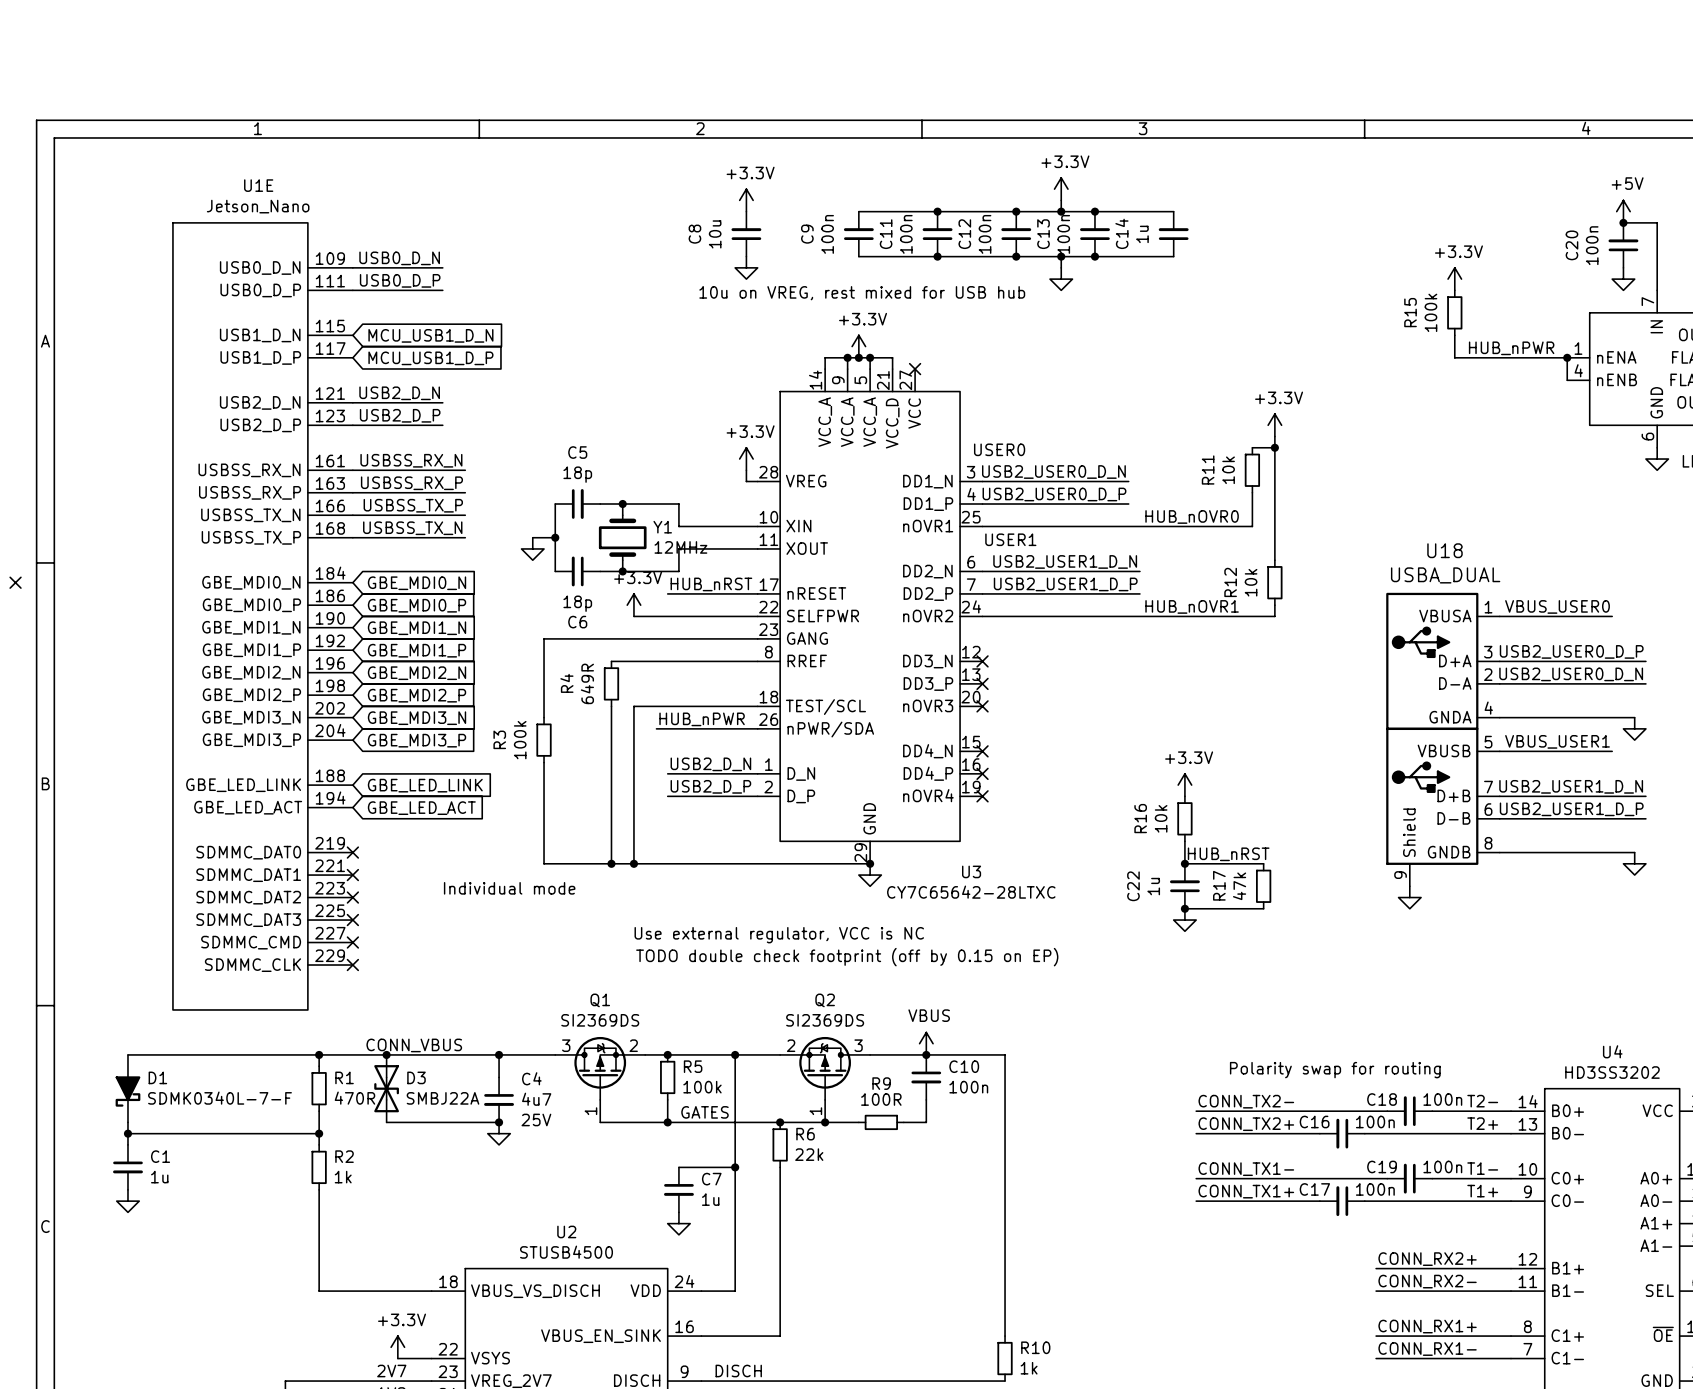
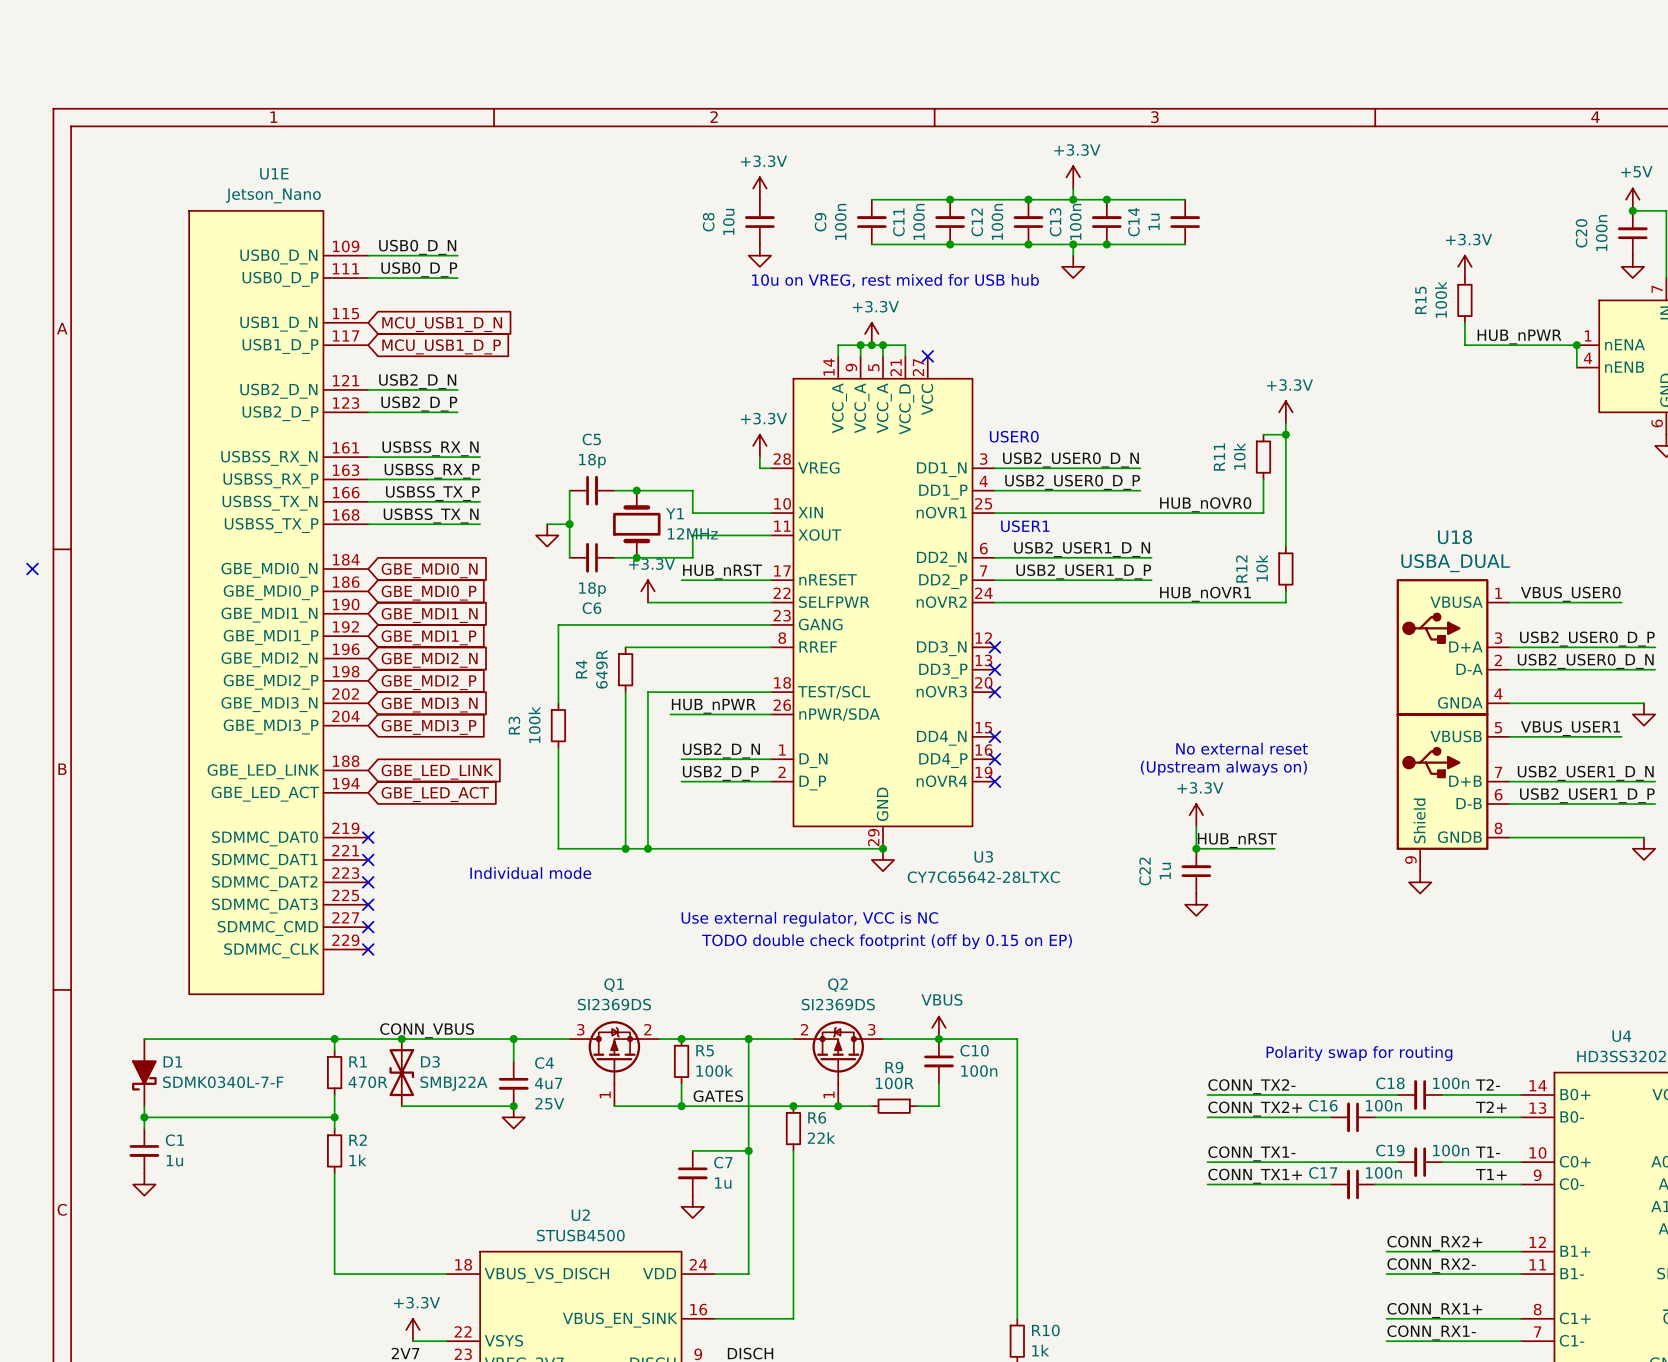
text: none -> No external reset (1242, 748)
text: none -> (Upstream always on) (1223, 768)
power symbol position: +3.3V (1184, 785) -> +3.3V (1196, 815)
R16: 10k (1184, 818) -> none
R17: 47k (1263, 886) -> none
wire: (1184, 908) (1263, 908) -> none
junction: (1184, 908) -> none

